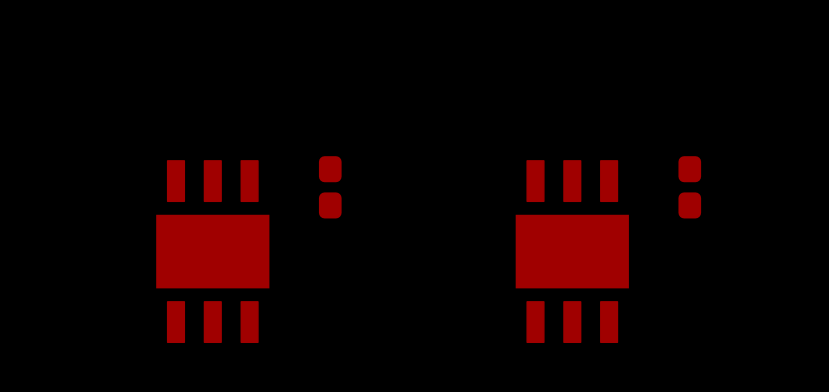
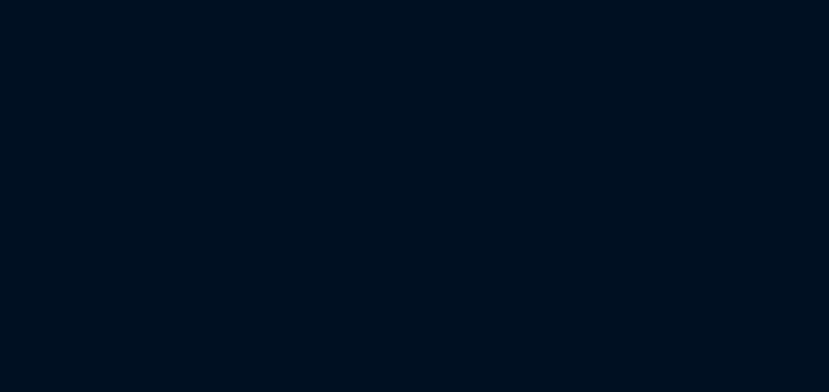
part: (330, 187) -> none
part: (689, 187) -> none
part: (212, 251) -> none
part: (572, 251) -> none

